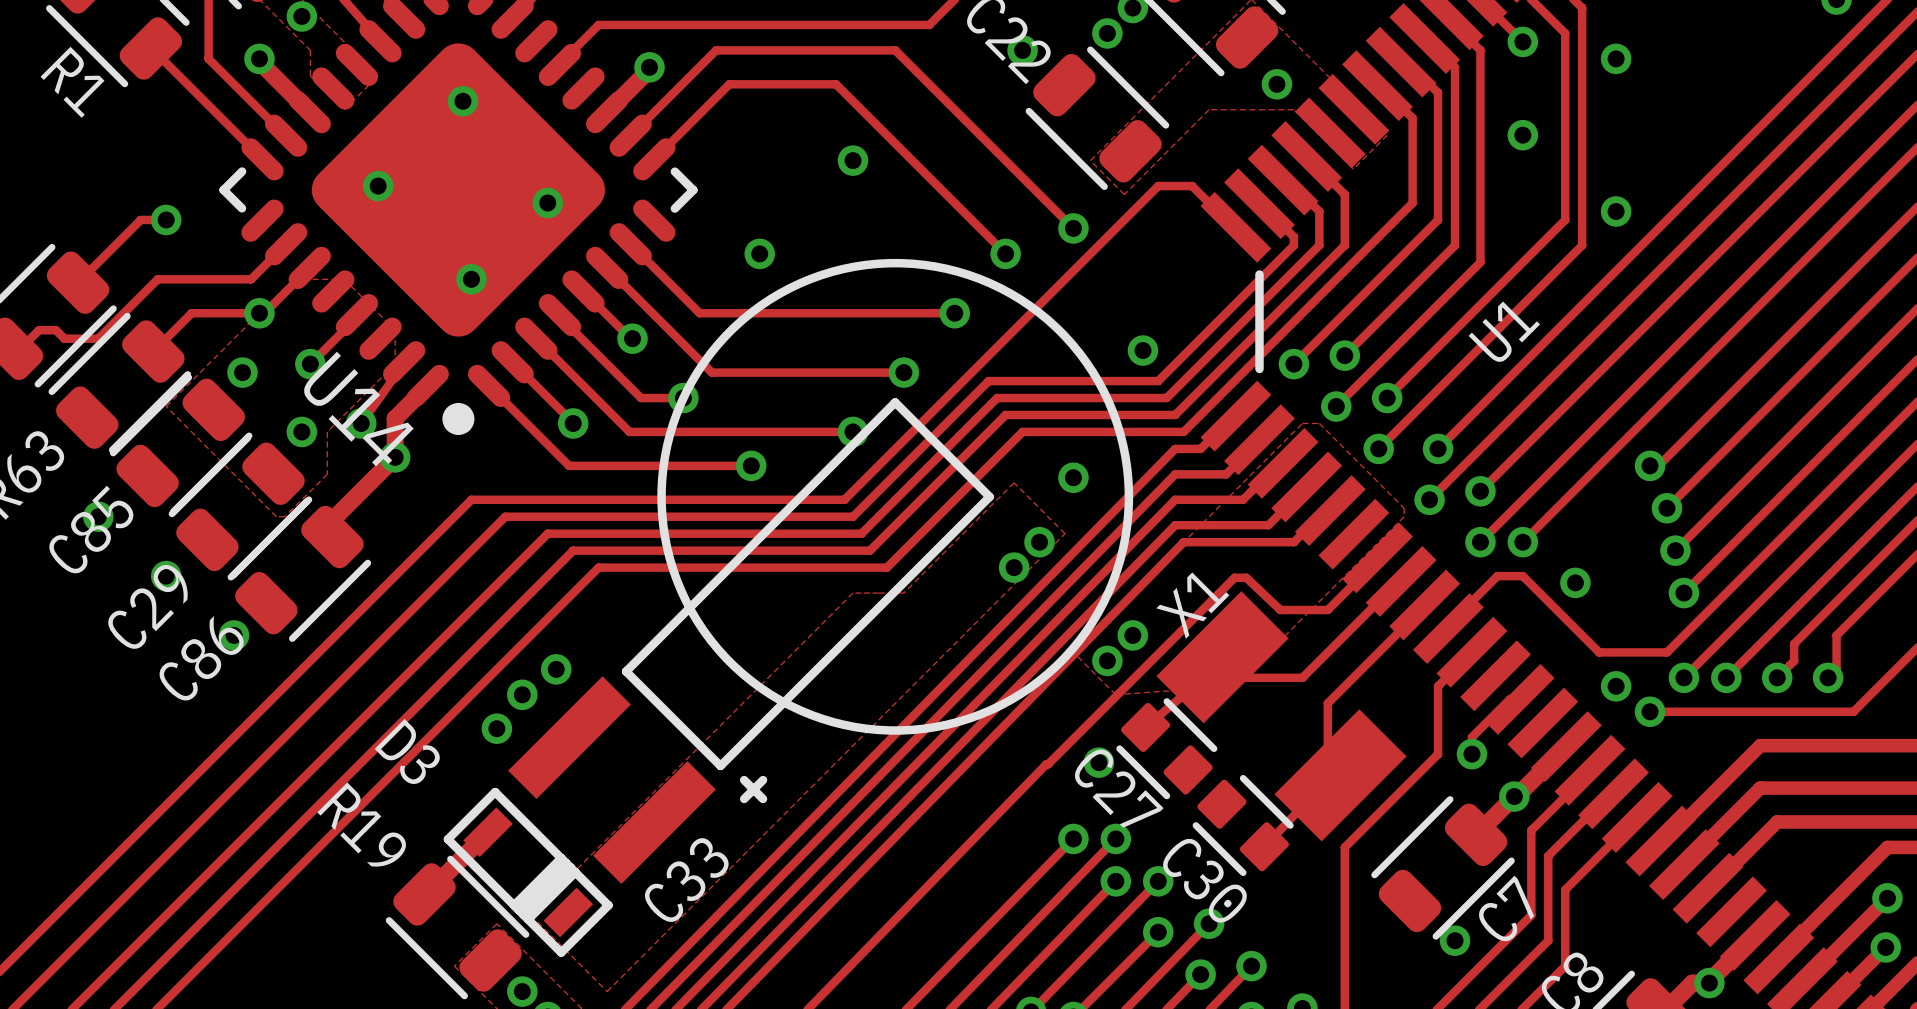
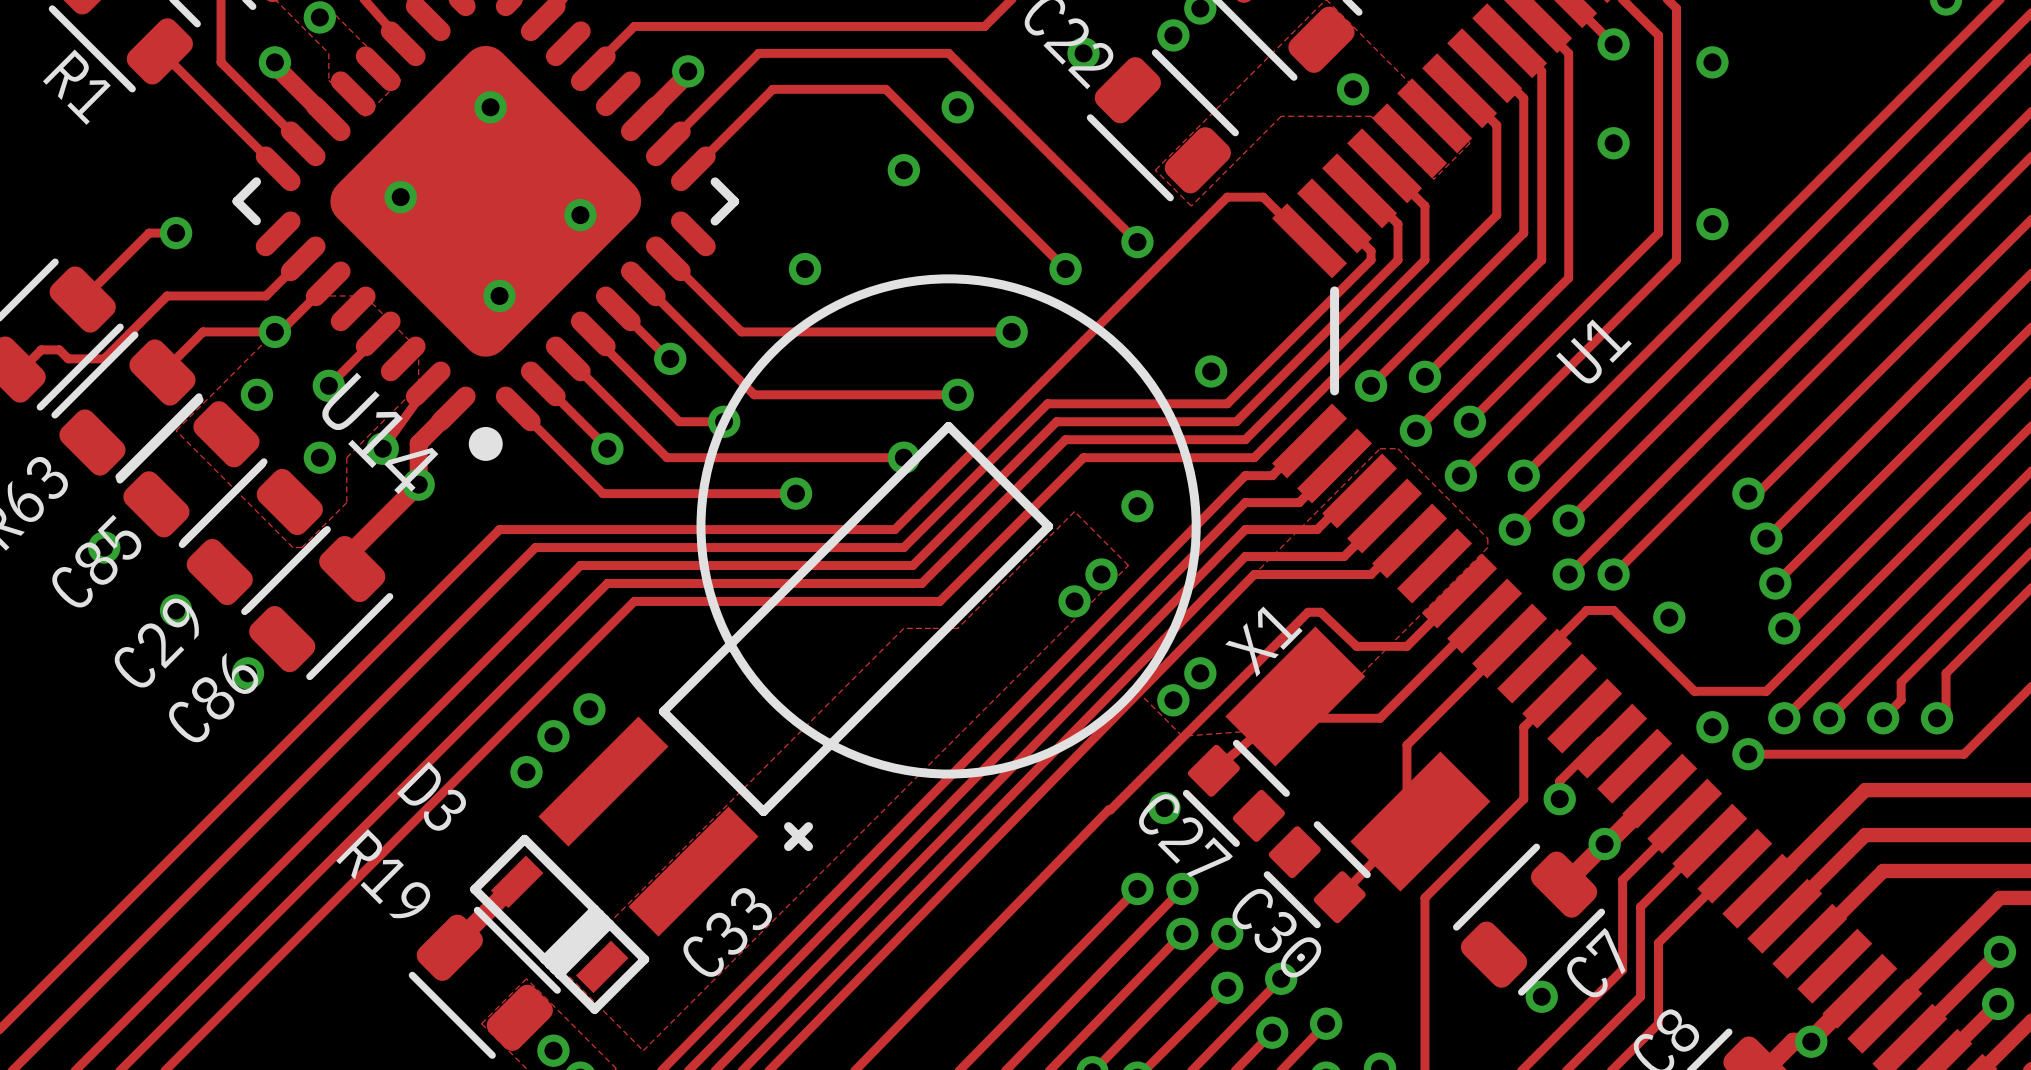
via: none -> (957, 107)

